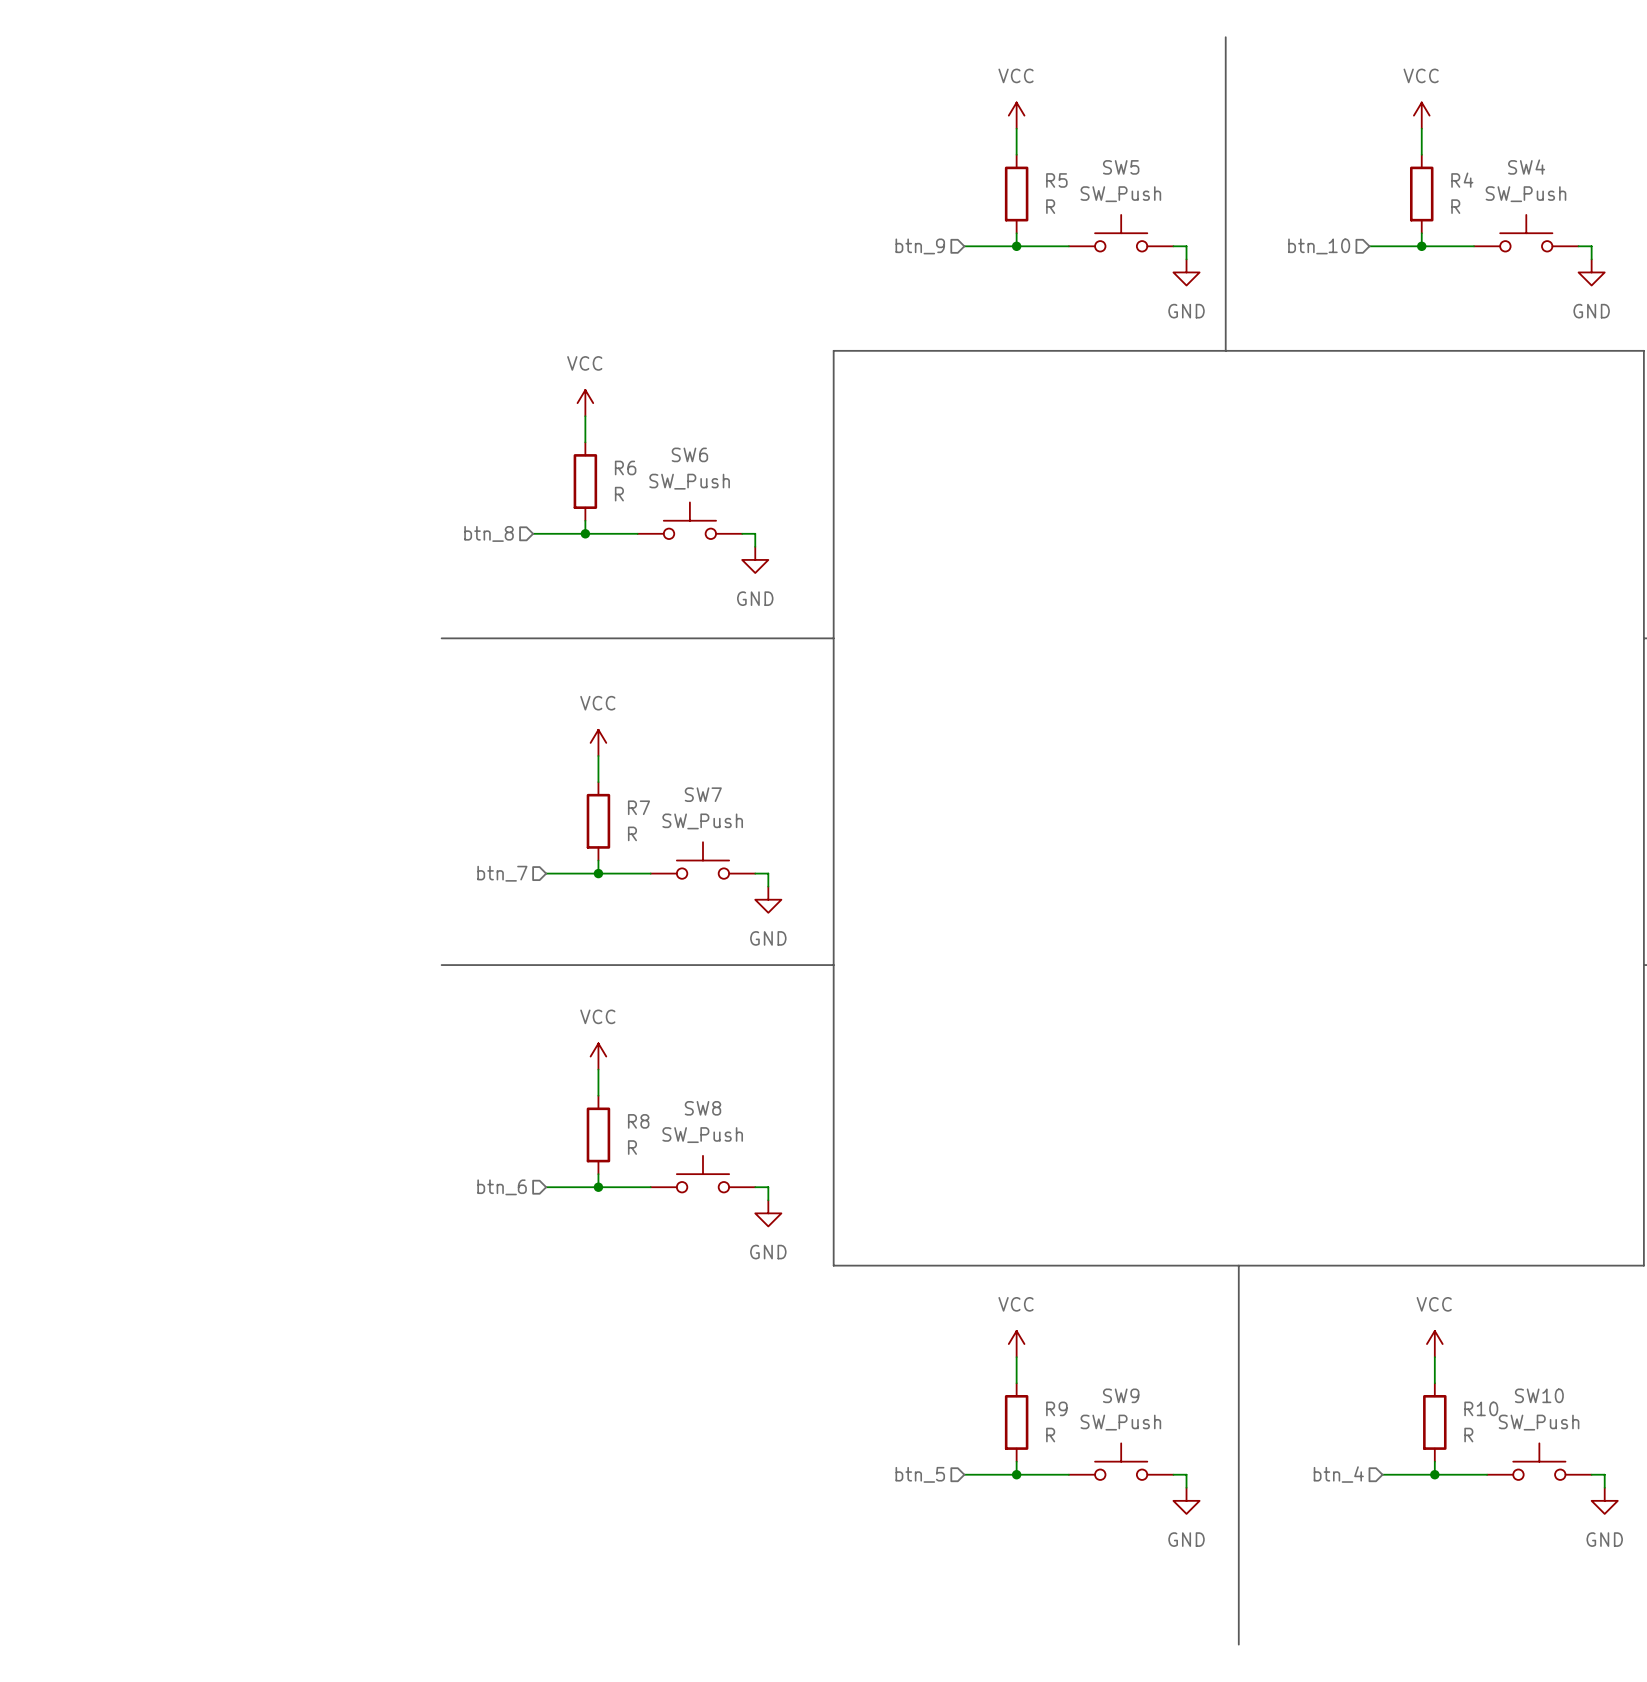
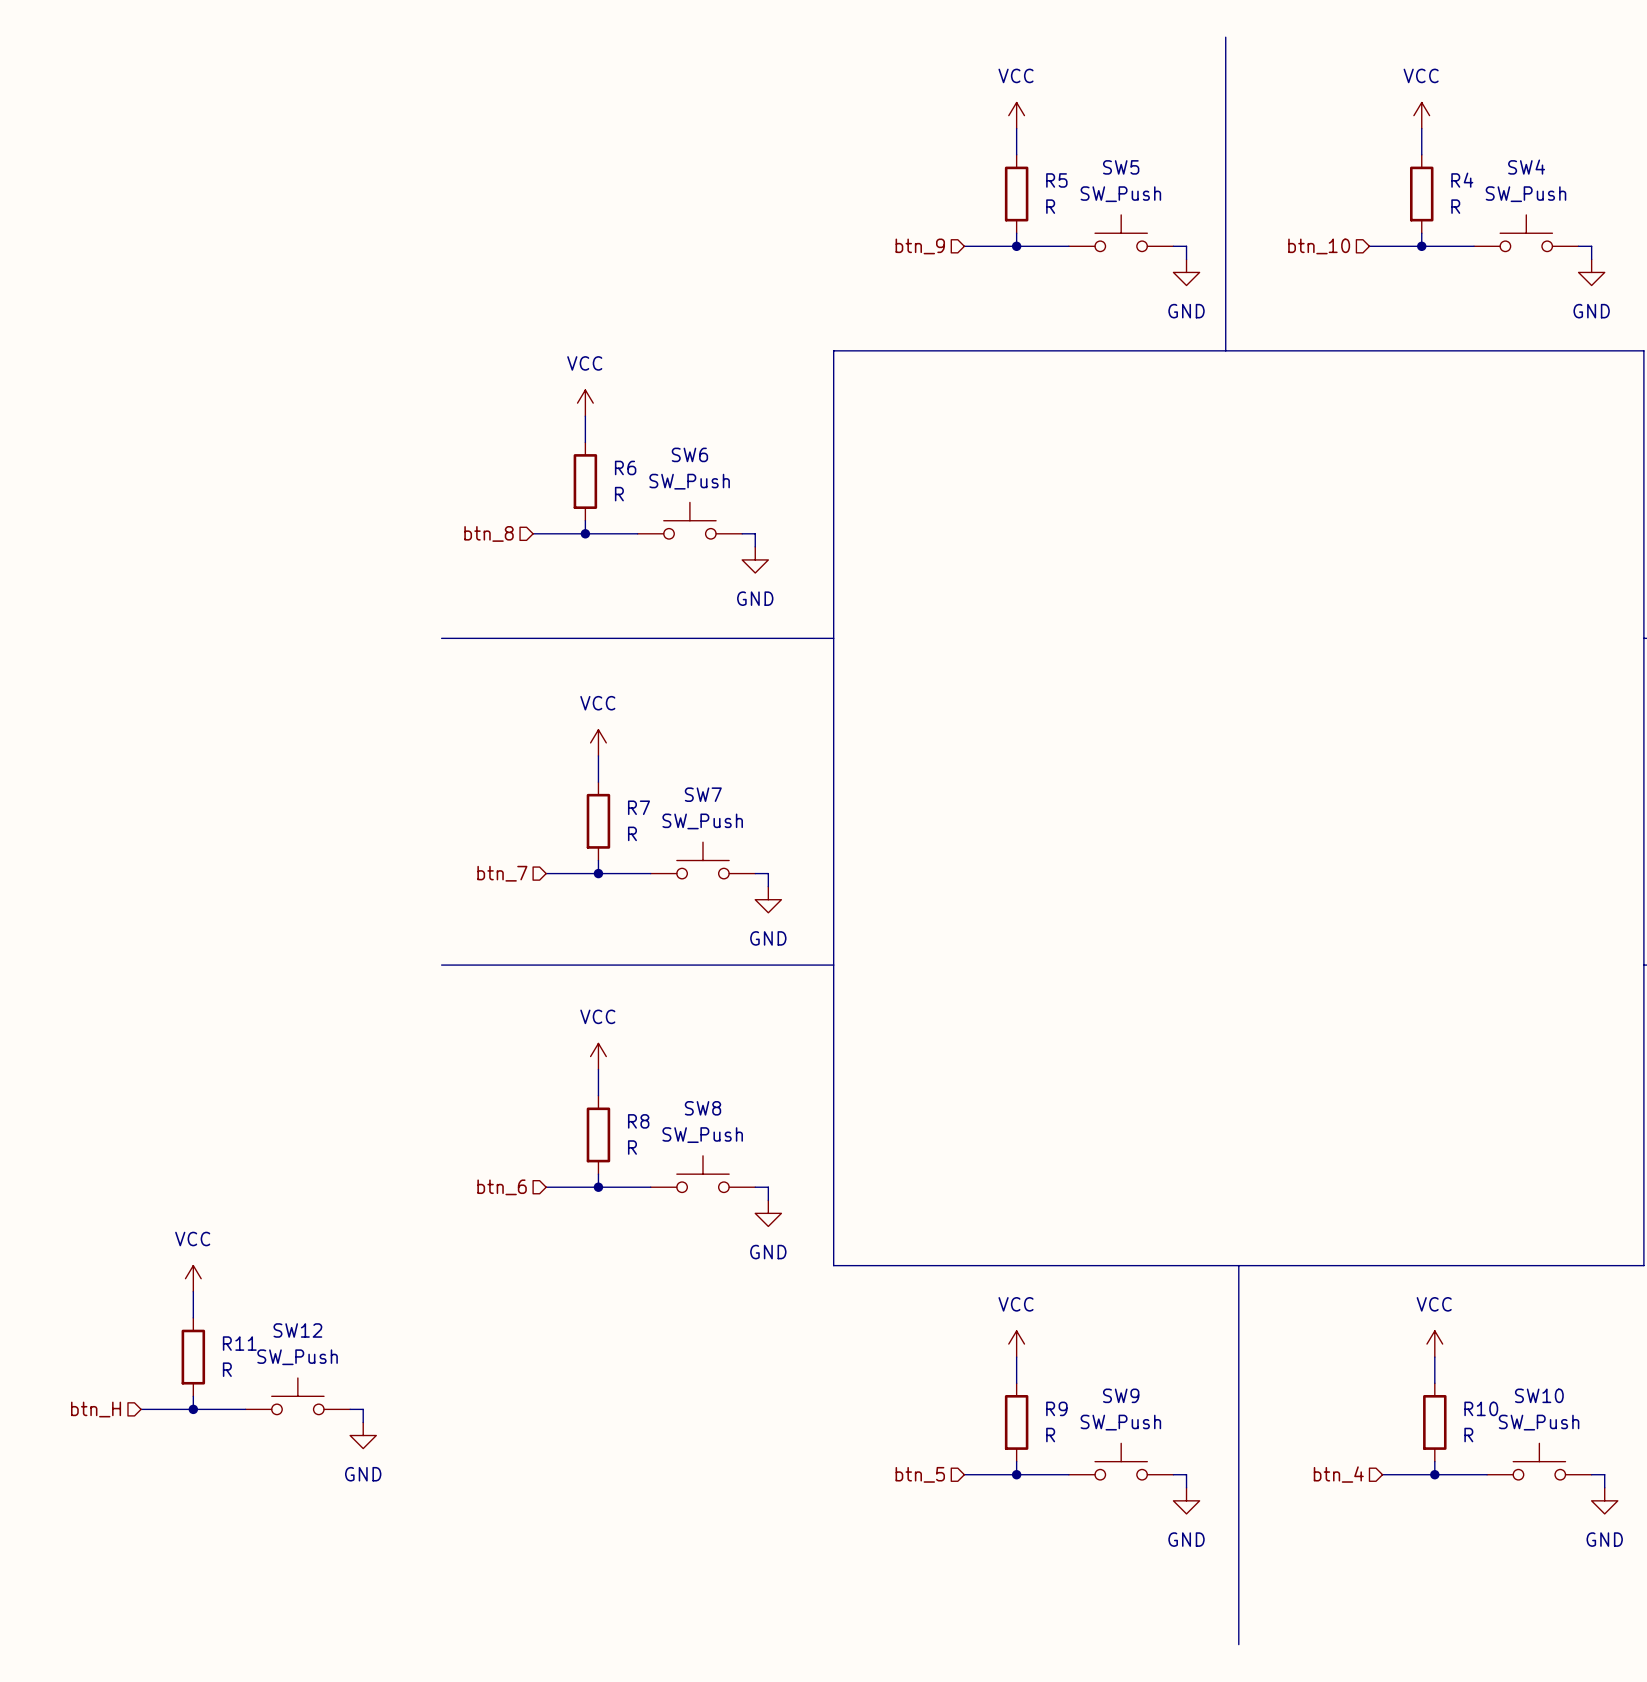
power symbol: none -> VCC (193, 1278)
wire: none -> (193, 1291) (193, 1317)
R11: none -> R (193, 1357)
wire: none -> (193, 1396) (193, 1409)
SW12: none -> SW_Push (297, 1396)
hierarchical label: none -> btn_H (96, 1409)
wire: none -> (141, 1409) (245, 1409)
junction: none -> (193, 1409)
wire: none -> (350, 1409) (363, 1409) (363, 1422)
power symbol: none -> GND (363, 1435)

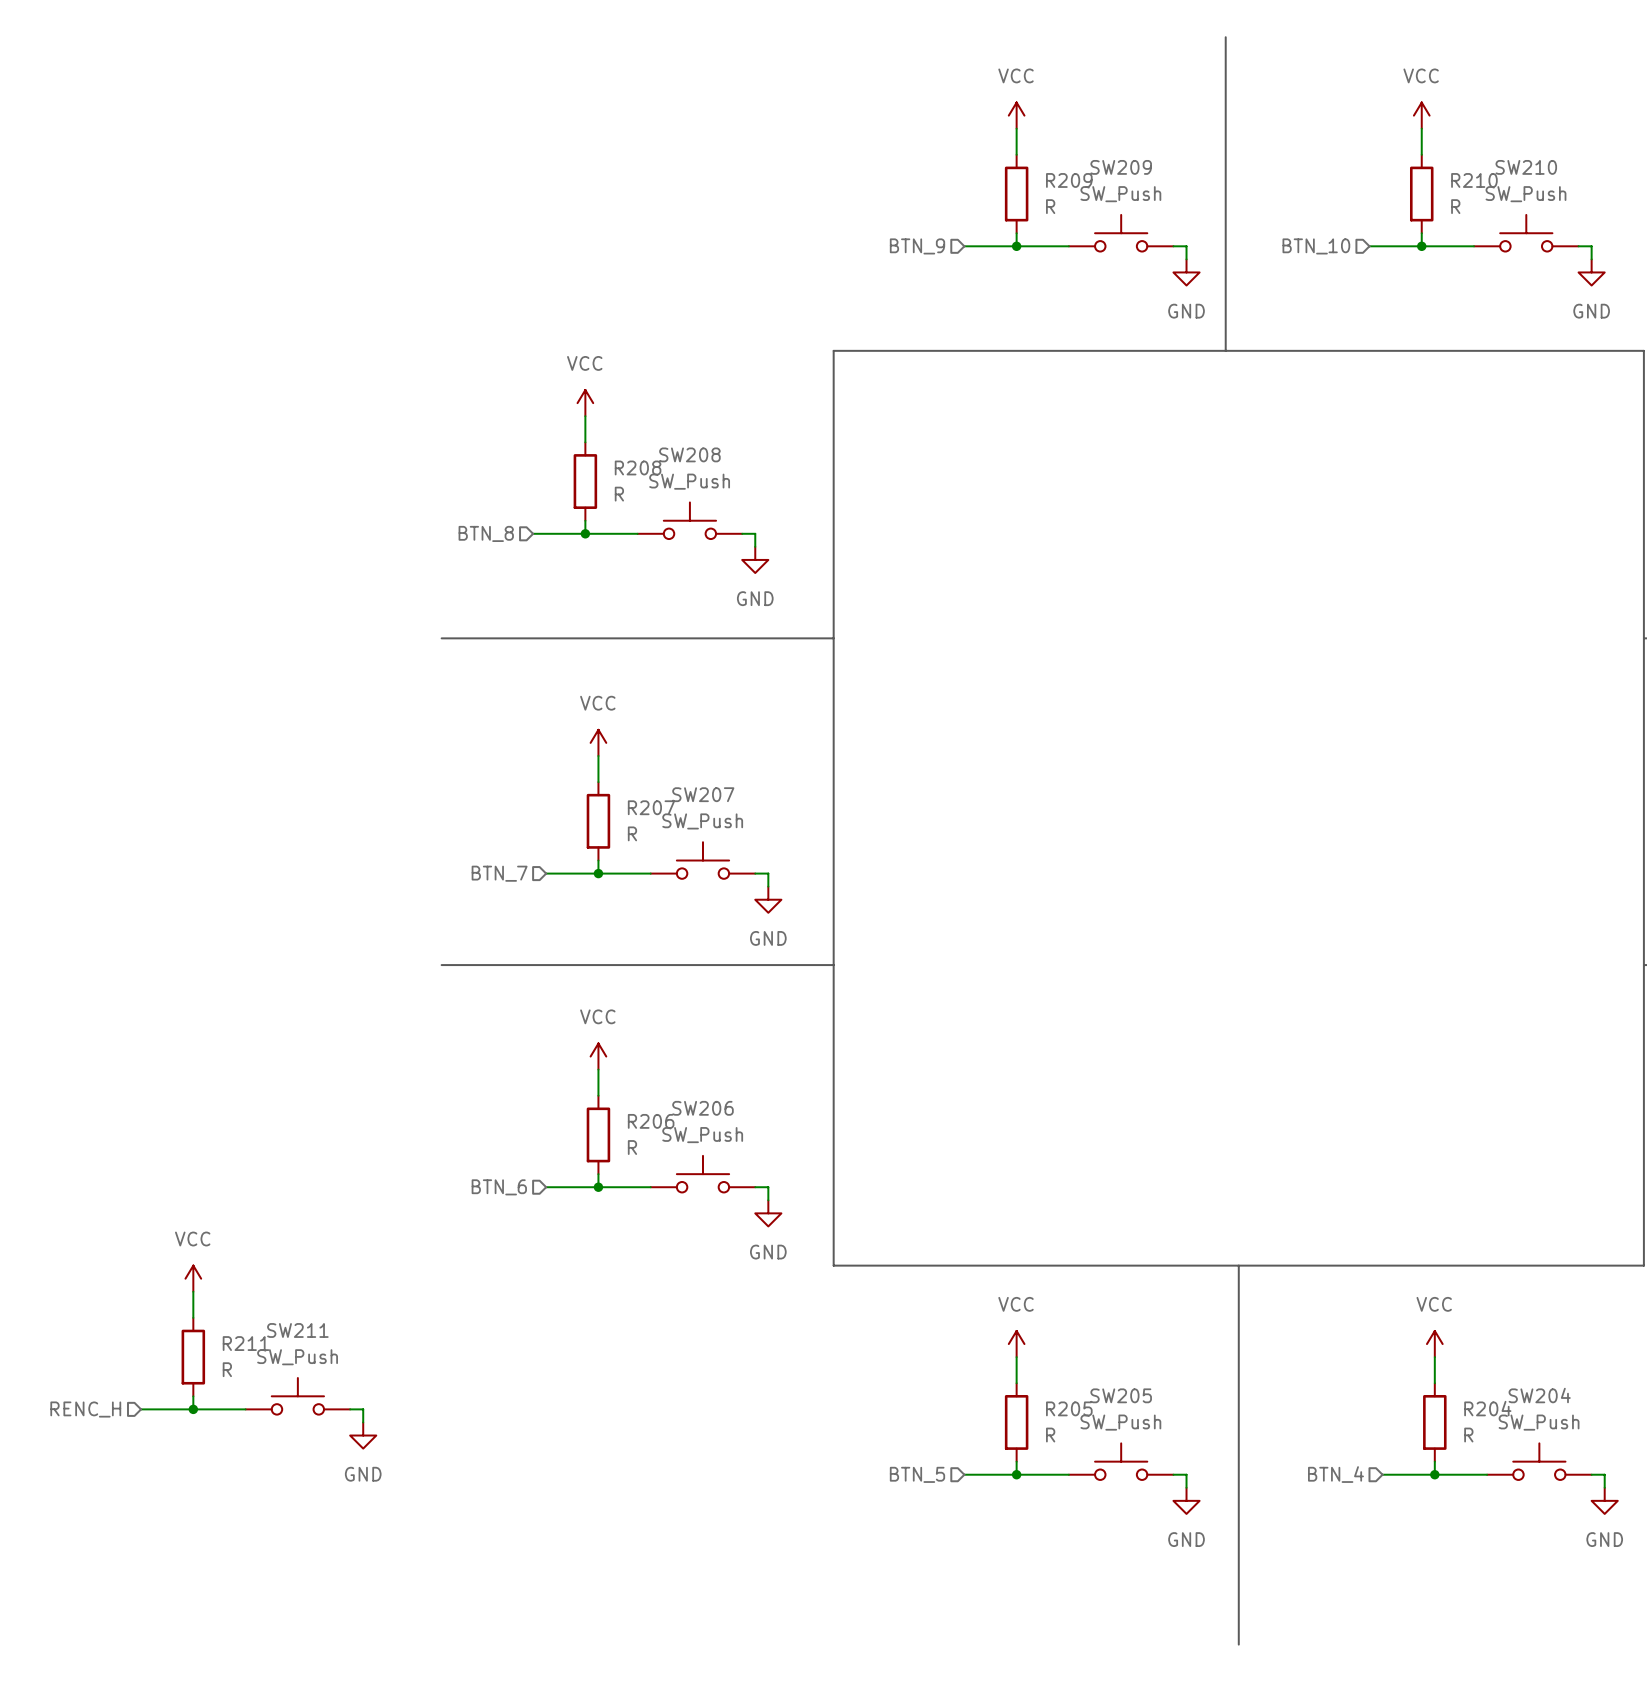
SW5 name: SW5 (1121, 167) -> SW209 (1121, 167)
SW4 name: SW4 (1526, 167) -> SW210 (1526, 167)
R5 name: R5 (1056, 180) -> R209 (1069, 180)
R4 name: R4 (1462, 180) -> R210 (1474, 180)
hierarchical label: btn_9 (920, 246) -> BTN_9 (917, 246)
hierarchical label: btn_10 (1319, 246) -> BTN_10 (1316, 246)
SW6 name: SW6 (689, 454) -> SW208 (689, 454)
R6 name: R6 (625, 467) -> R208 (638, 467)
hierarchical label: btn_8 (489, 533) -> BTN_8 (486, 533)
SW7 name: SW7 (703, 794) -> SW207 (703, 794)
R7 name: R7 (638, 807) -> R207 (651, 807)
hierarchical label: btn_7 (502, 873) -> BTN_7 (499, 873)
SW8 name: SW8 (702, 1108) -> SW206 (702, 1108)
R8 name: R8 (638, 1121) -> R206 (651, 1121)
hierarchical label: btn_6 (502, 1187) -> BTN_6 (499, 1187)
SW12 name: SW12 (297, 1330) -> SW211 (297, 1330)
R11 name: R11 (239, 1343) -> R211 (246, 1343)
SW9 name: SW9 (1121, 1395) -> SW205 (1121, 1395)
SW10 name: SW10 (1539, 1395) -> SW204 (1539, 1395)
R9 name: R9 (1056, 1408) -> R205 (1069, 1408)
R10 name: R10 (1481, 1408) -> R204 (1487, 1408)
hierarchical label: btn_H (96, 1409) -> RENC_H (85, 1409)
hierarchical label: btn_5 (920, 1474) -> BTN_5 (917, 1474)
hierarchical label: btn_4 (1338, 1474) -> BTN_4 (1335, 1474)

